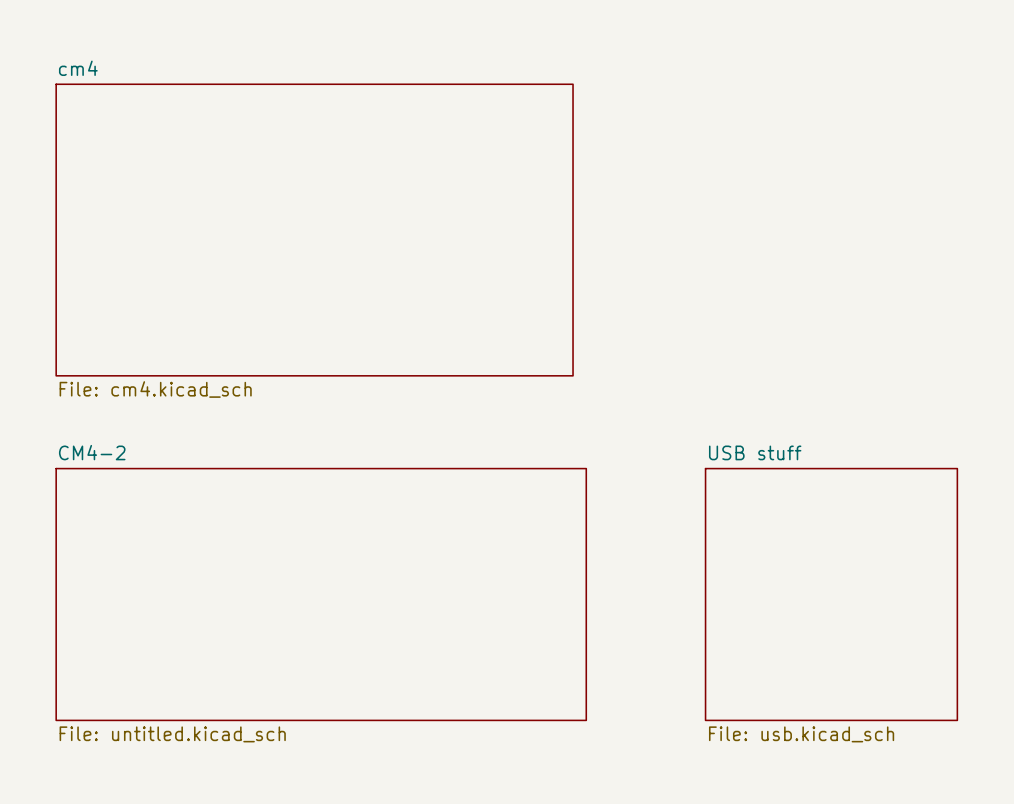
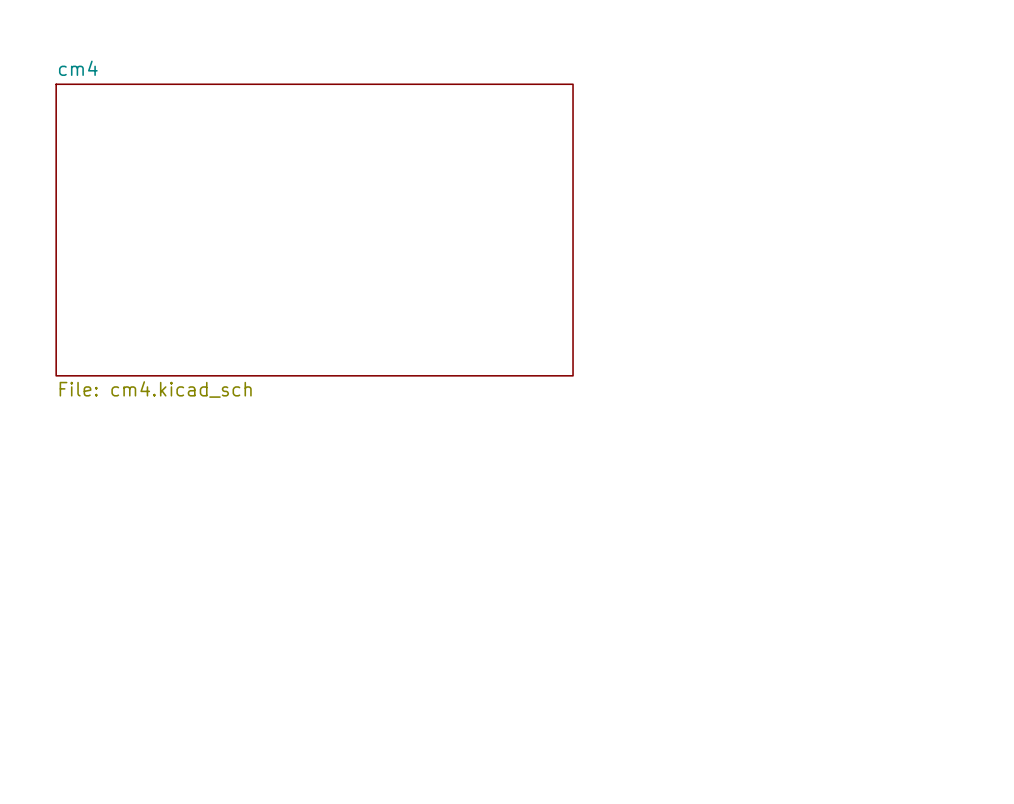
sheet CM4-2: File: untitled.kicad_sch (321, 594) -> none
sheet USB stuff: File: usb.kicad_sch (831, 594) -> none

